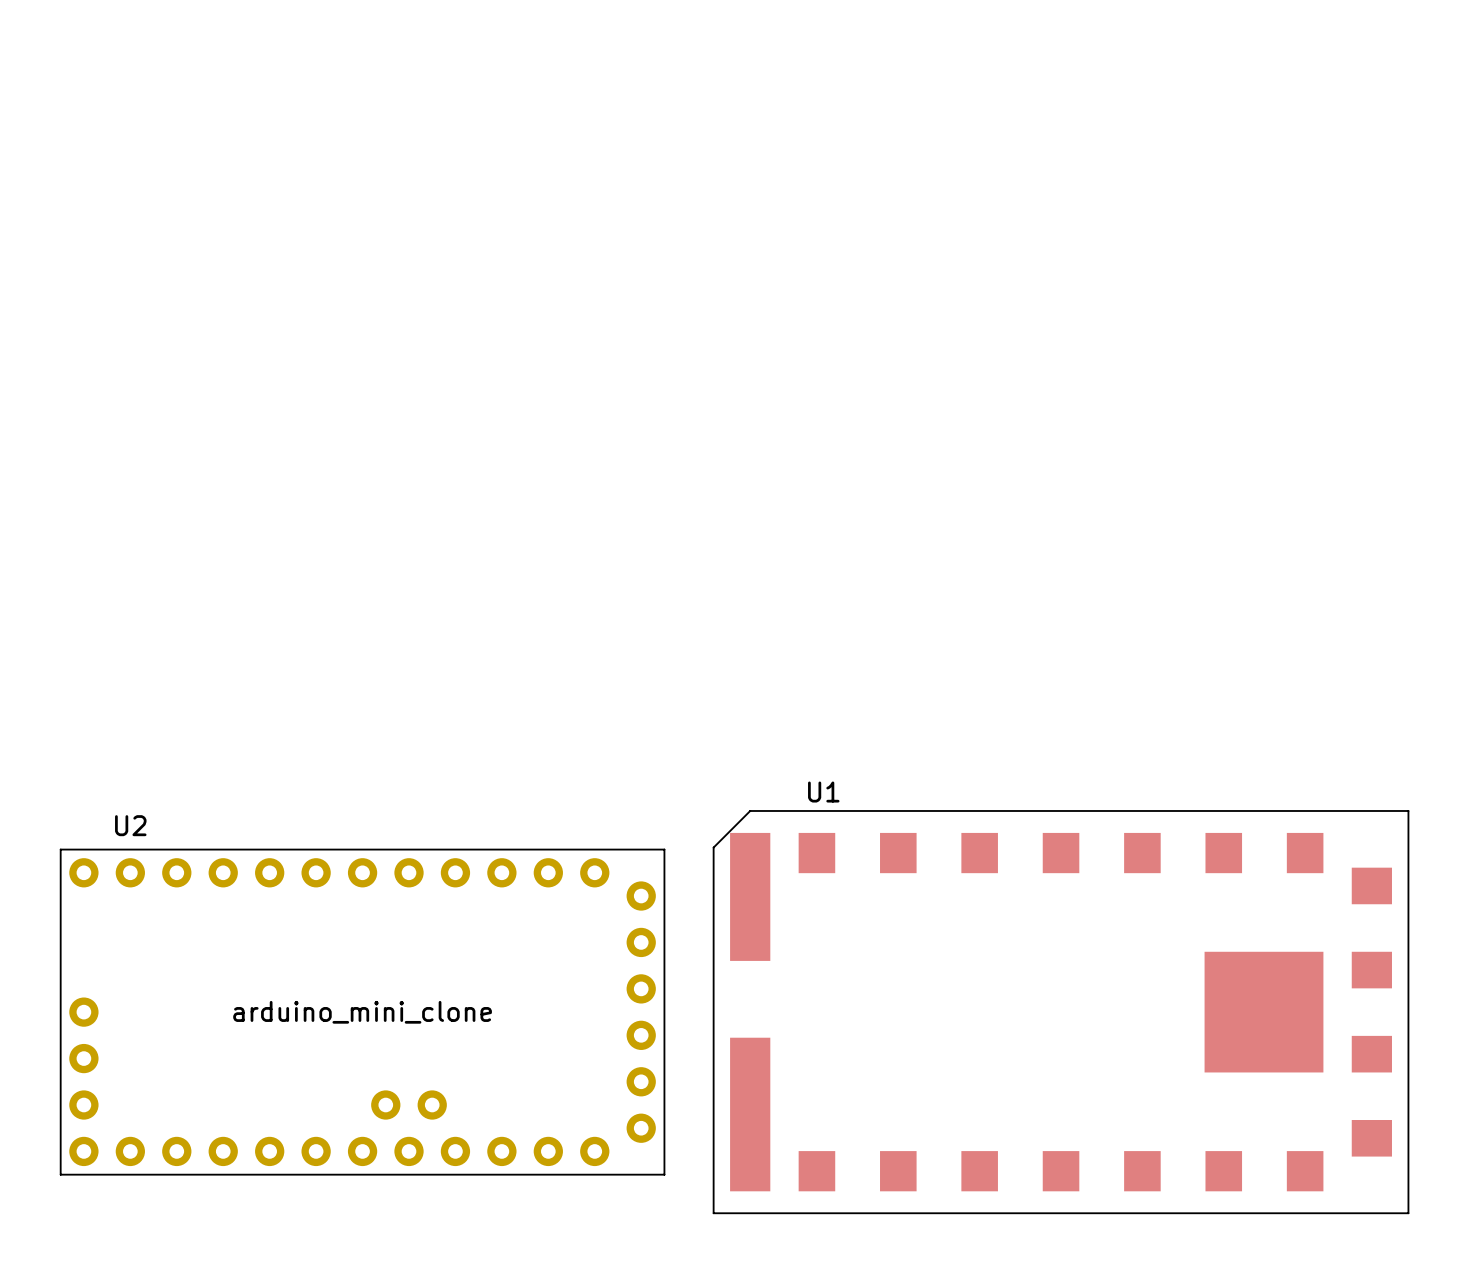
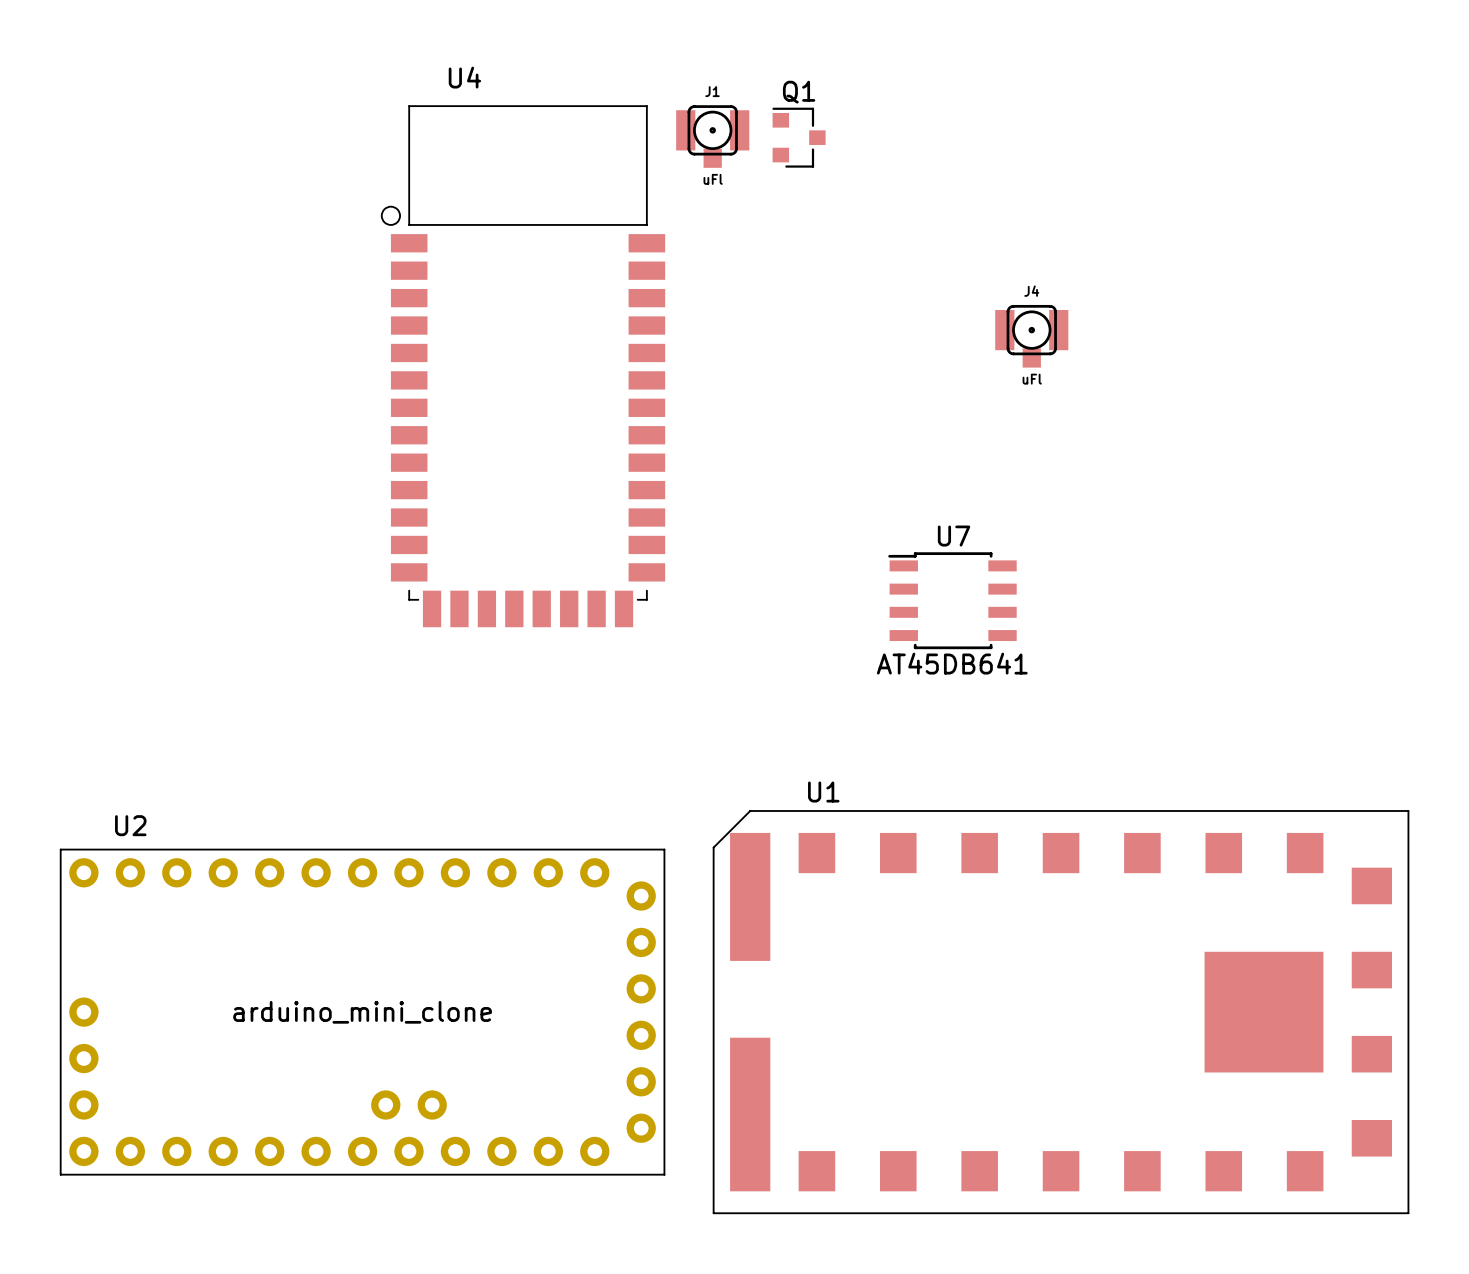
J1: none -> uFl (712, 136)
Q1: none -> (799, 137)
J4: none -> uFl (1031, 336)
U4: none -> (523, 366)
U7: none -> AT45DB641 (952, 600)

